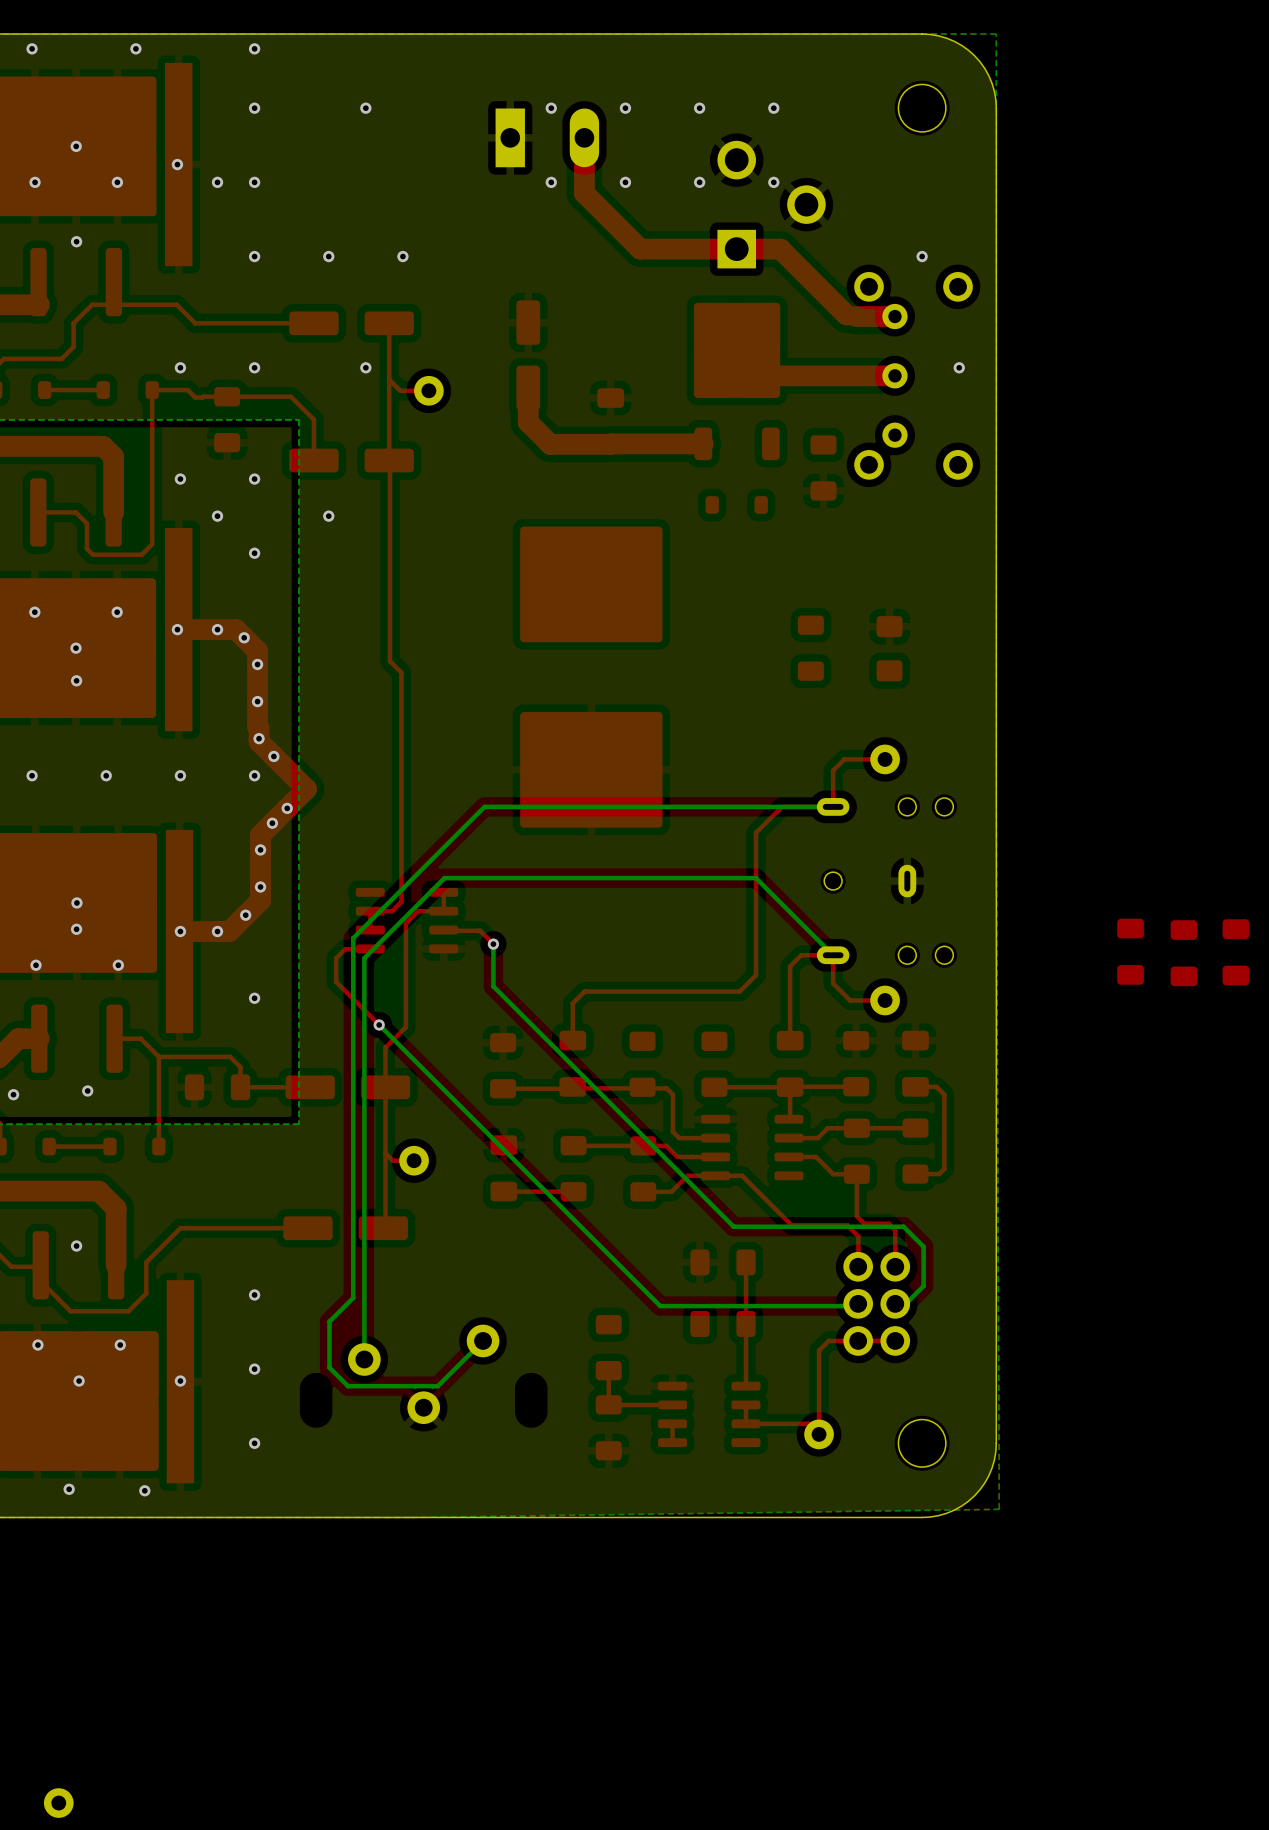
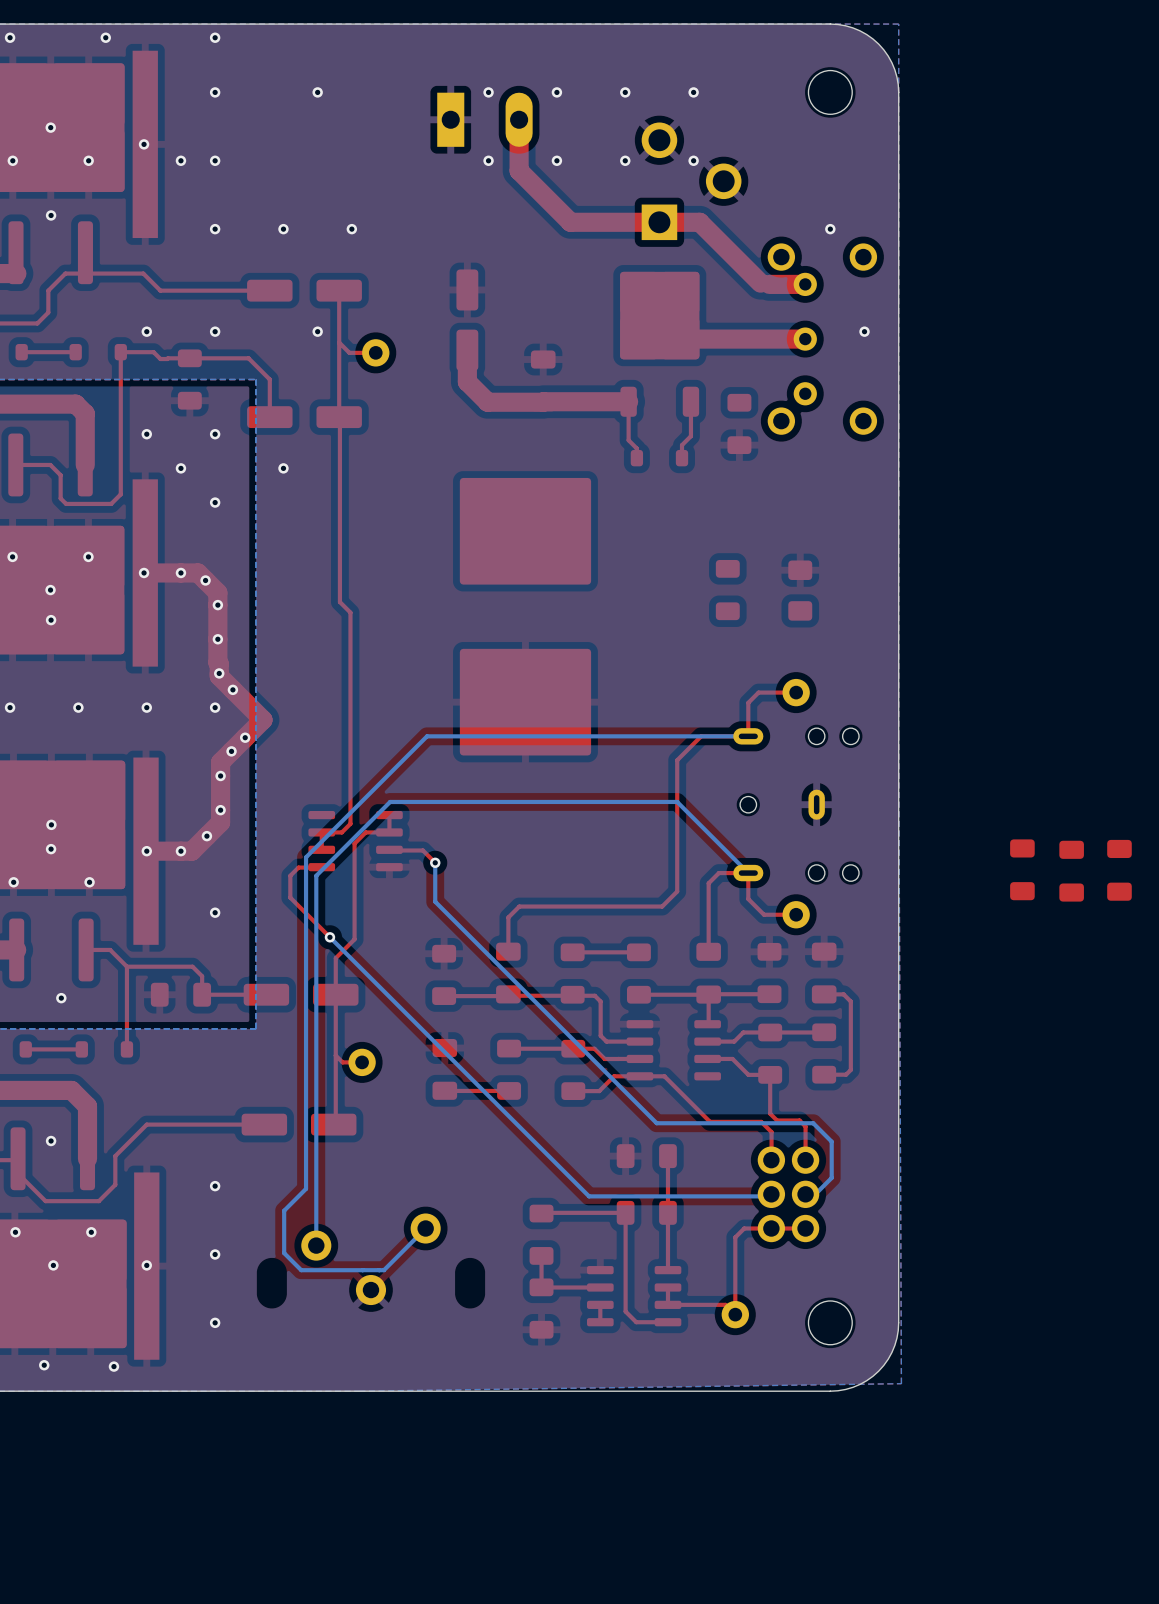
top track: none -> (628, 401) (628, 440) (636, 448) (636, 458)
top track: none -> (690, 401) (690, 436) (682, 445) (682, 458)
top track: none -> (638, 952) (572, 952)
top track: none -> (541, 1213) (625, 1212) (625, 1311) (636, 1322) (667, 1322)

